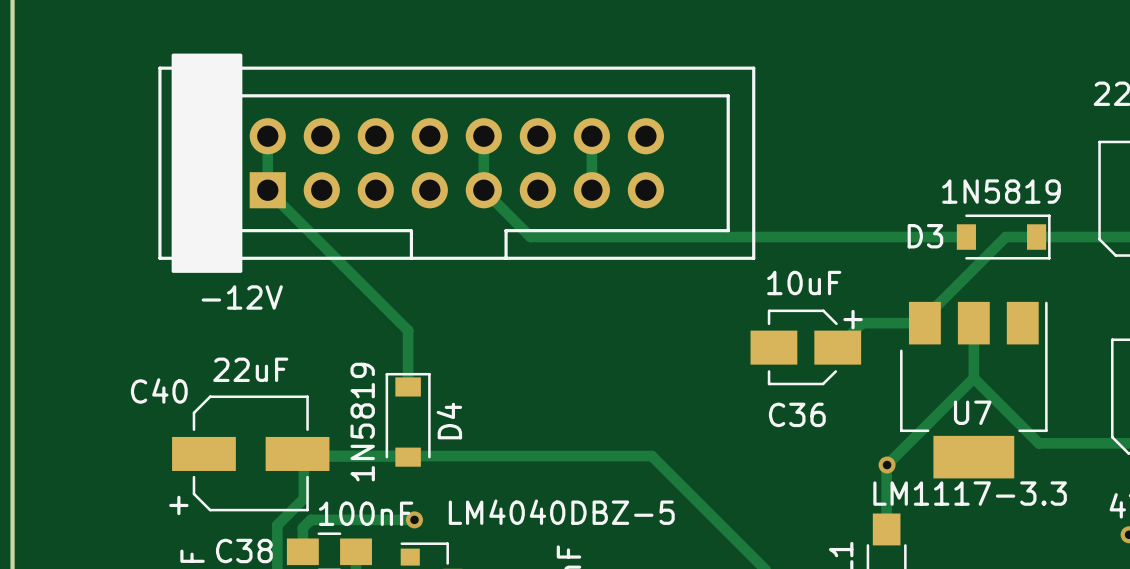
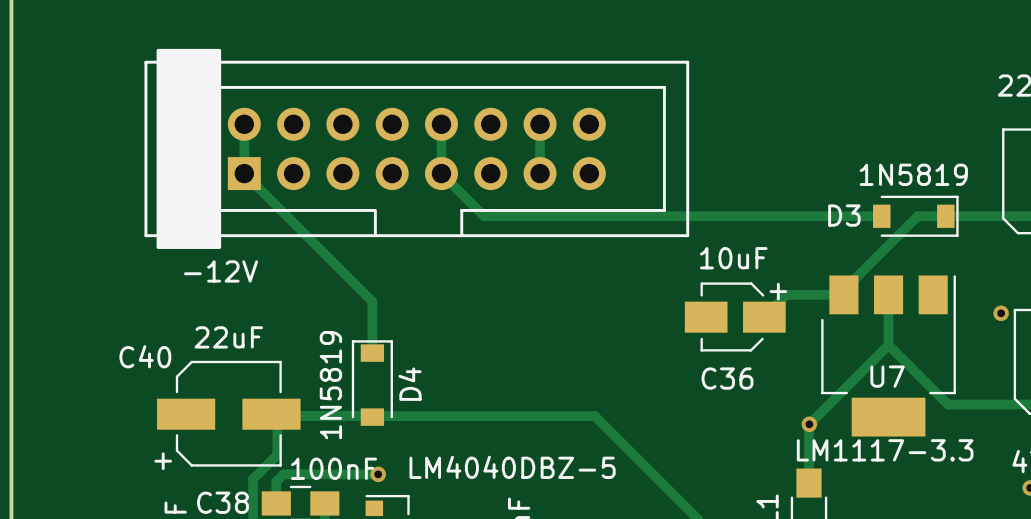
via: none -> (1001, 313)

